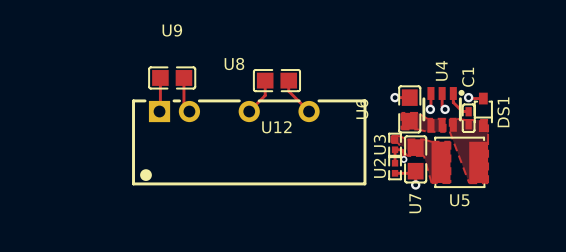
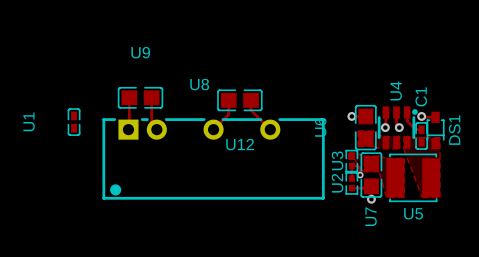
U1: none -> (74, 122)

